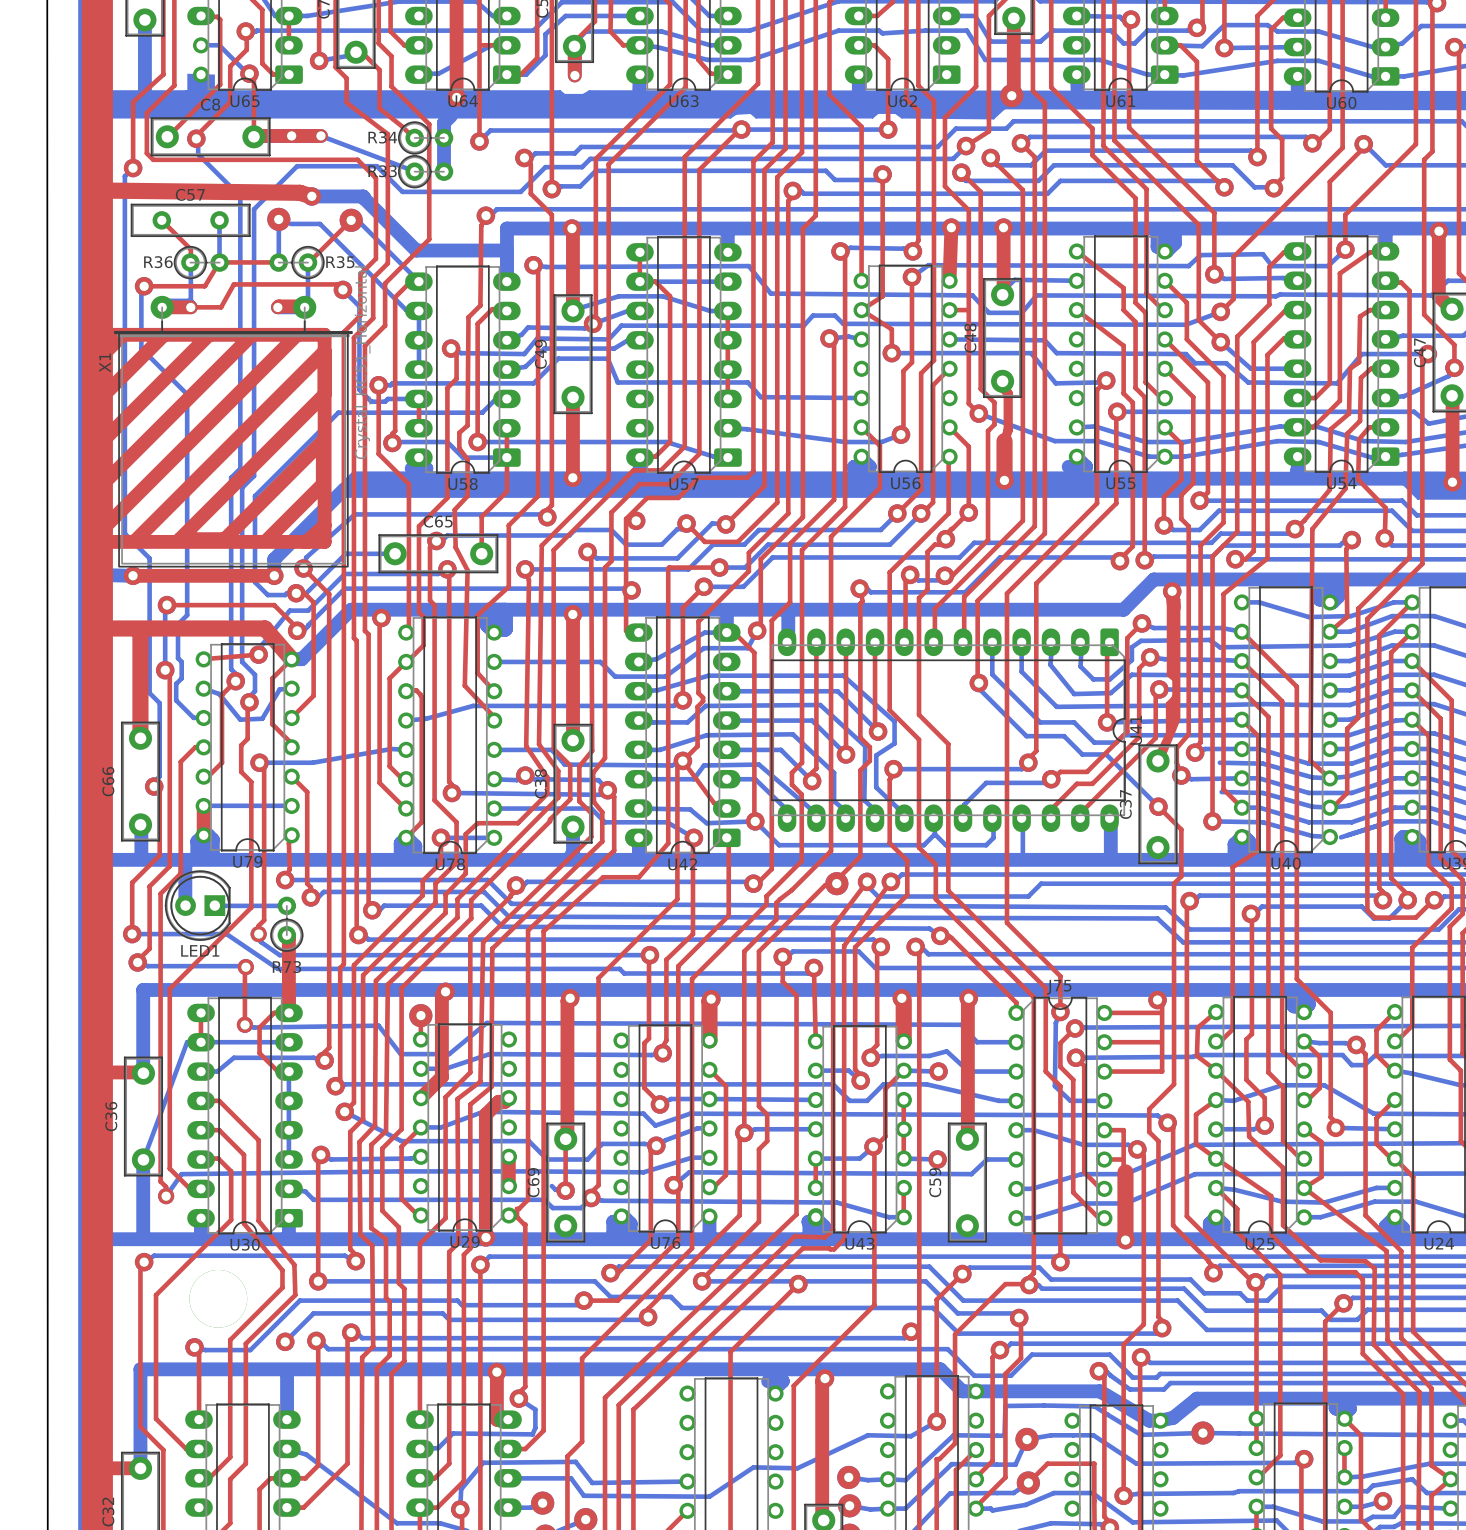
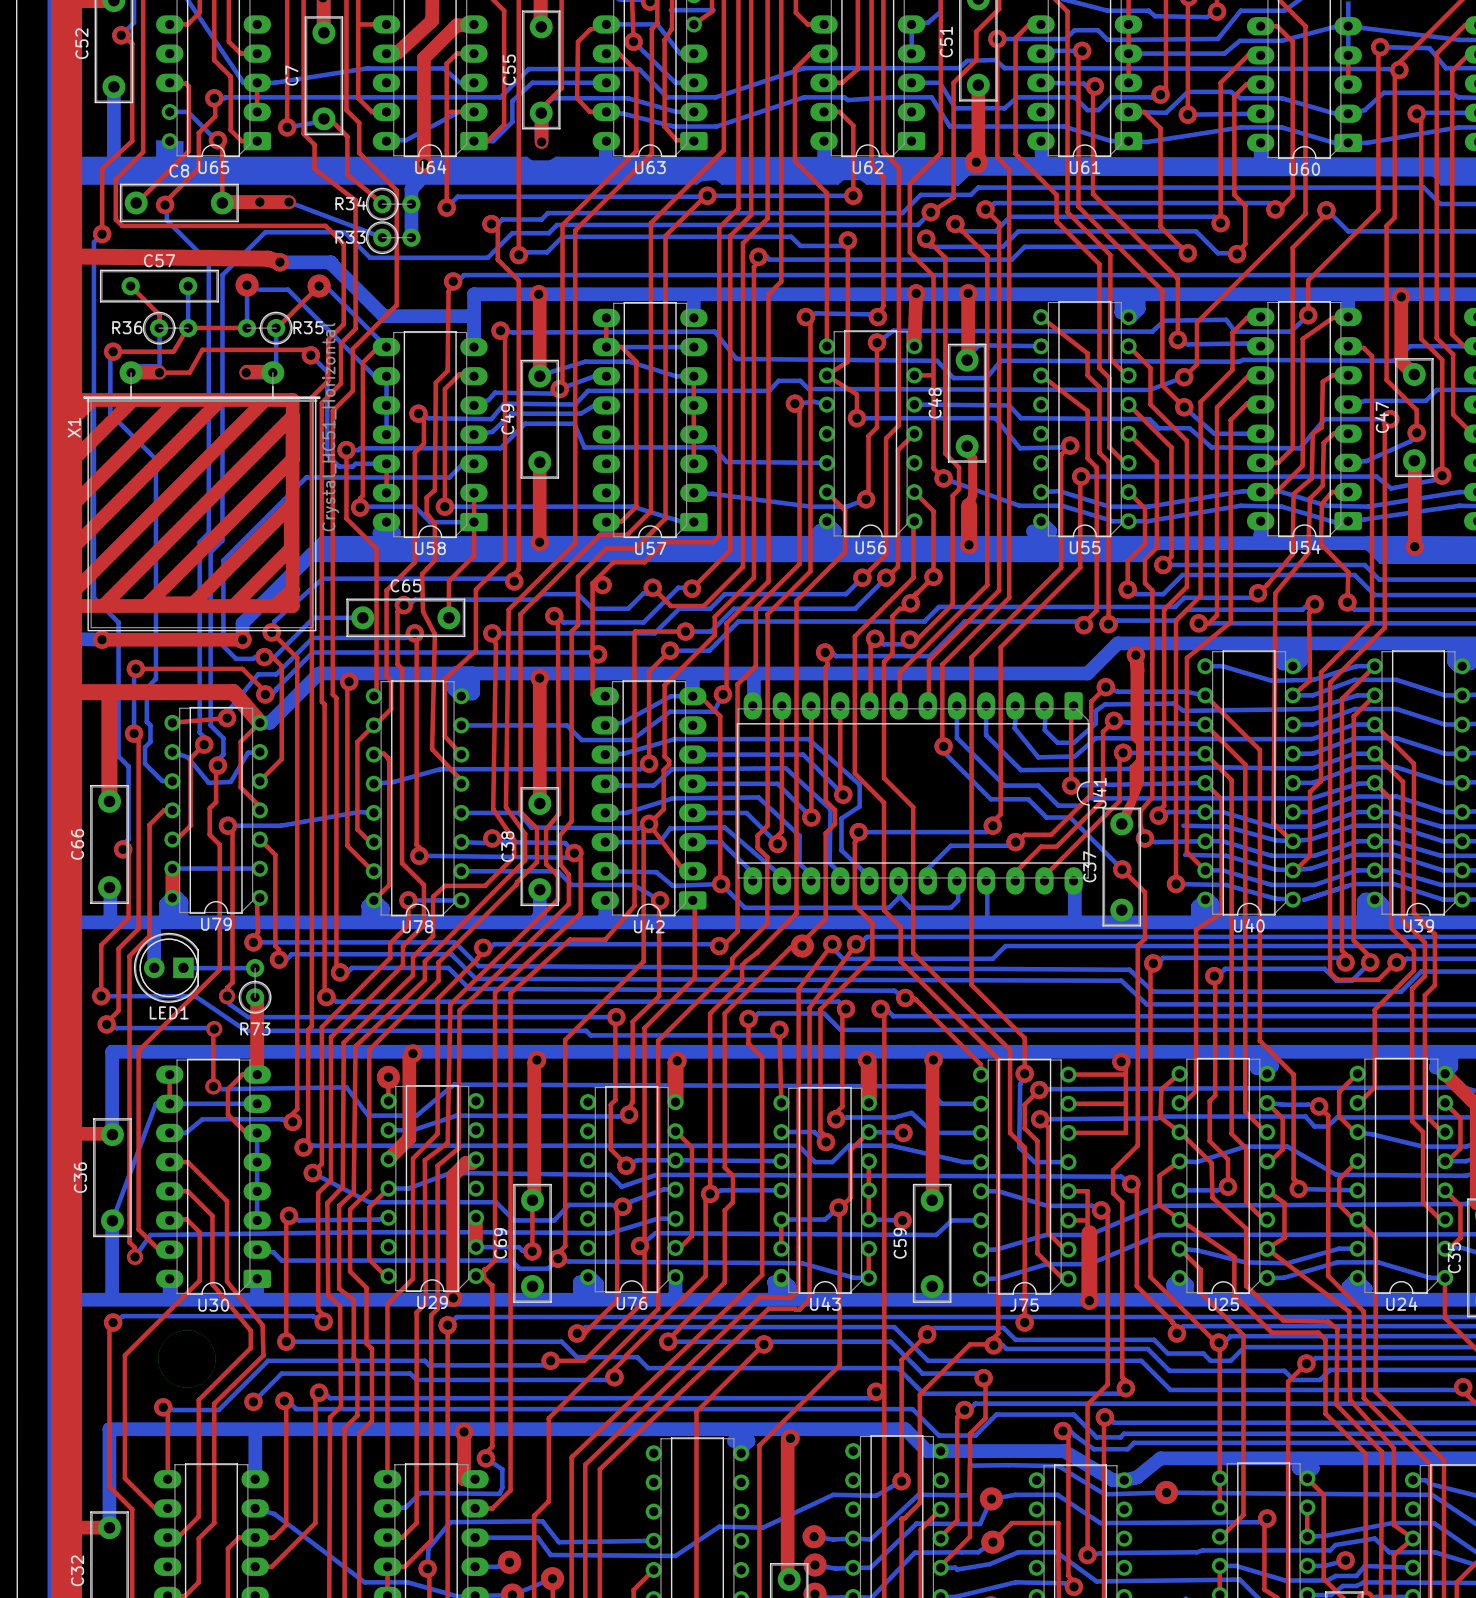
J75 rotation: 0° (1060, 1115) -> 180° (1024, 1176)
bottom track: none -> (475, 1247) (518, 1247)

